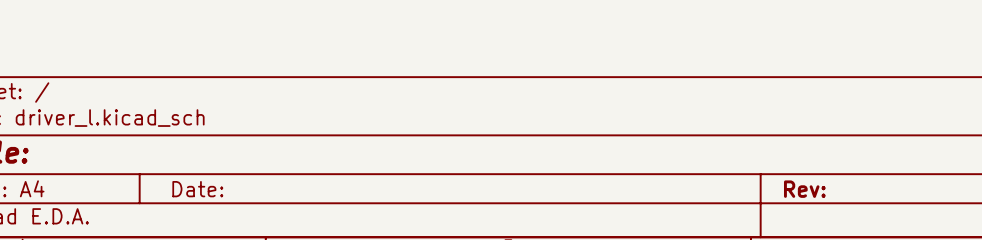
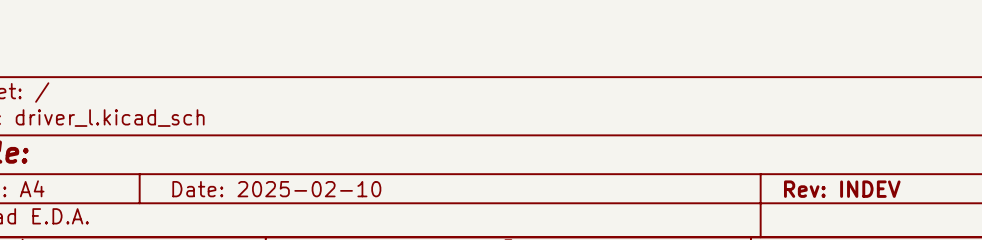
title block: Date: (197, 189) -> Date: 2025-02-10 (276, 189)
title block: Rev: (804, 189) -> Rev: INDEV (842, 189)

